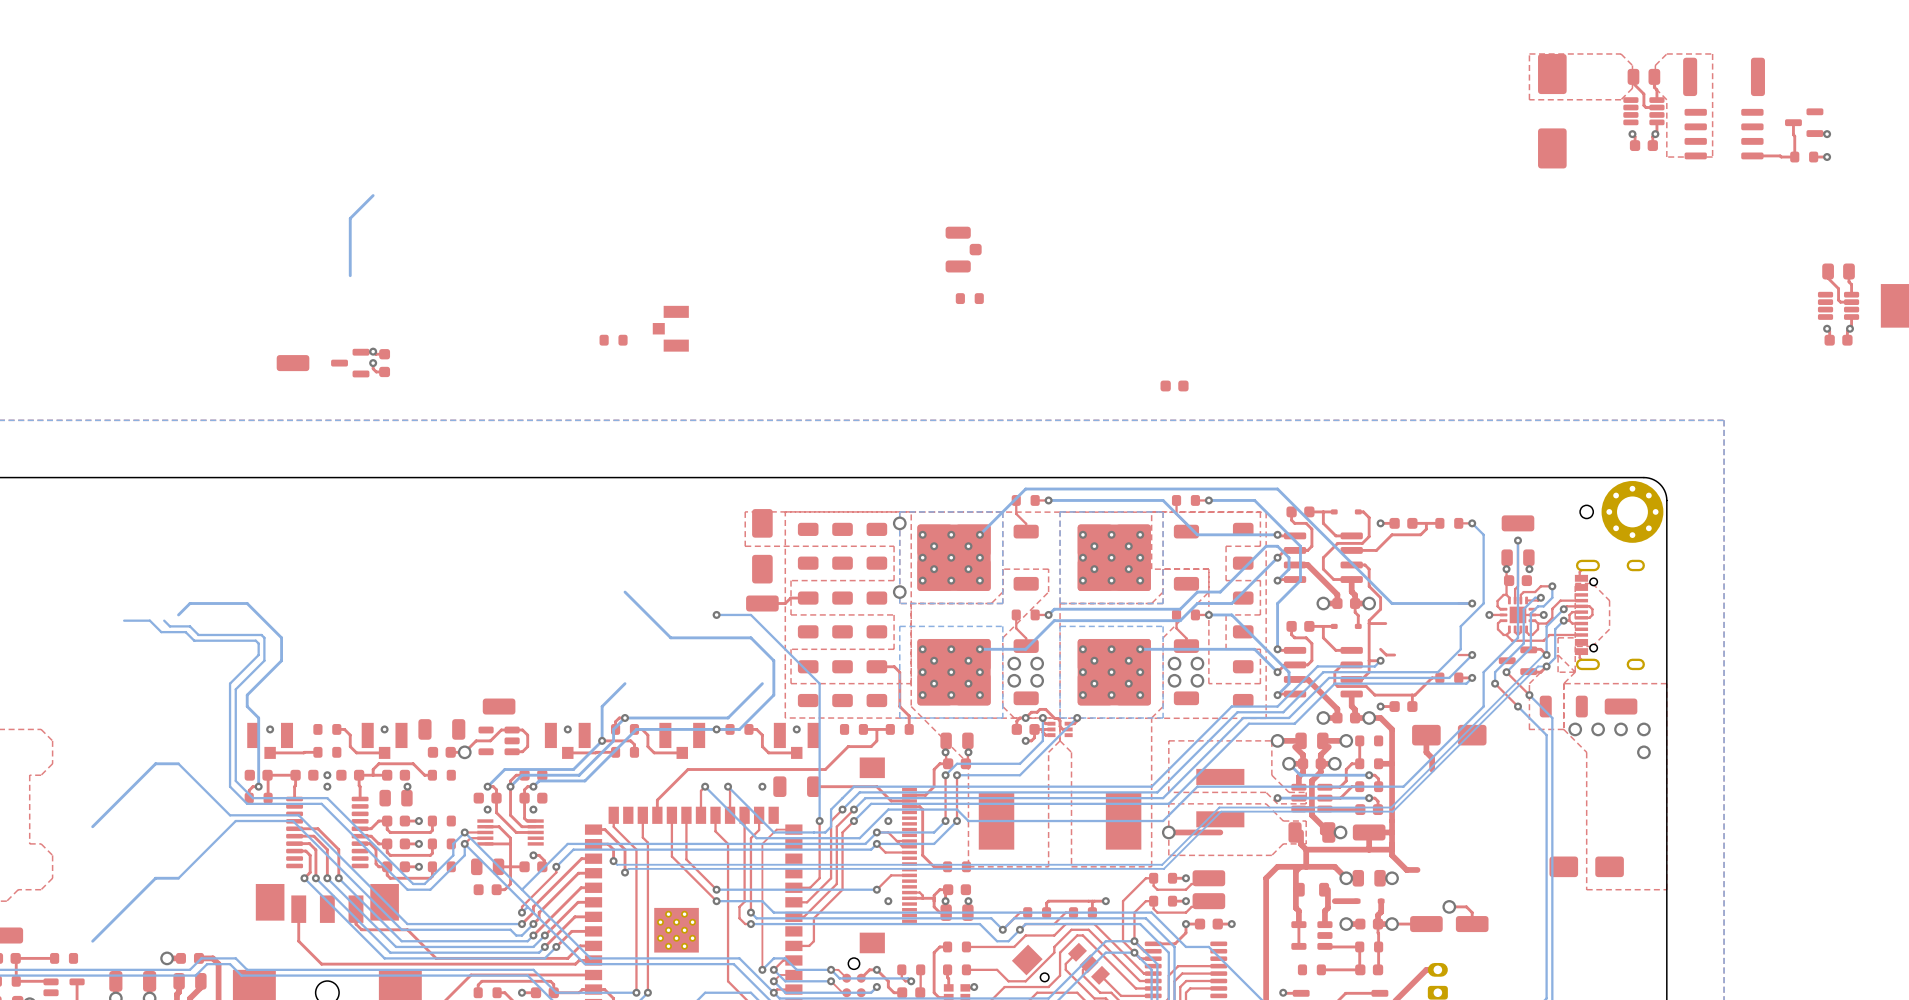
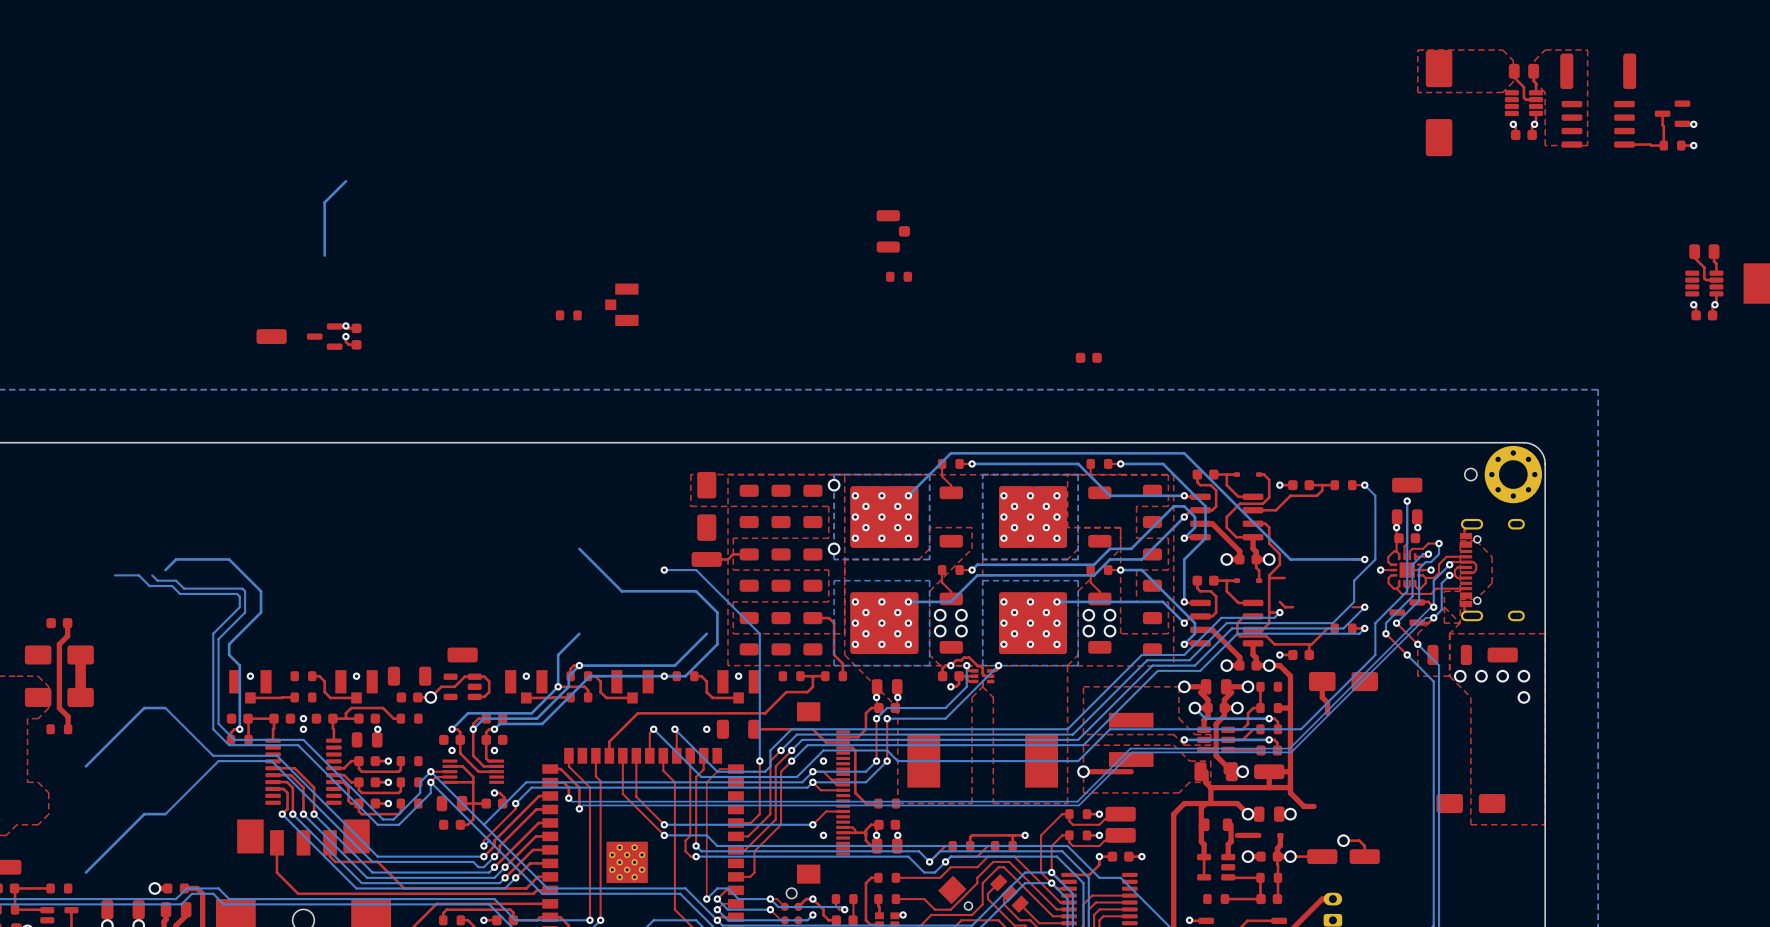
part: none -> (59, 623)
top track: none -> (67, 623) (67, 636) (59, 644) (59, 708) (68, 716) (68, 729)
part: none -> (59, 654)
top track: none -> (80, 654) (80, 697)
part: none -> (59, 697)
part: none -> (59, 729)

